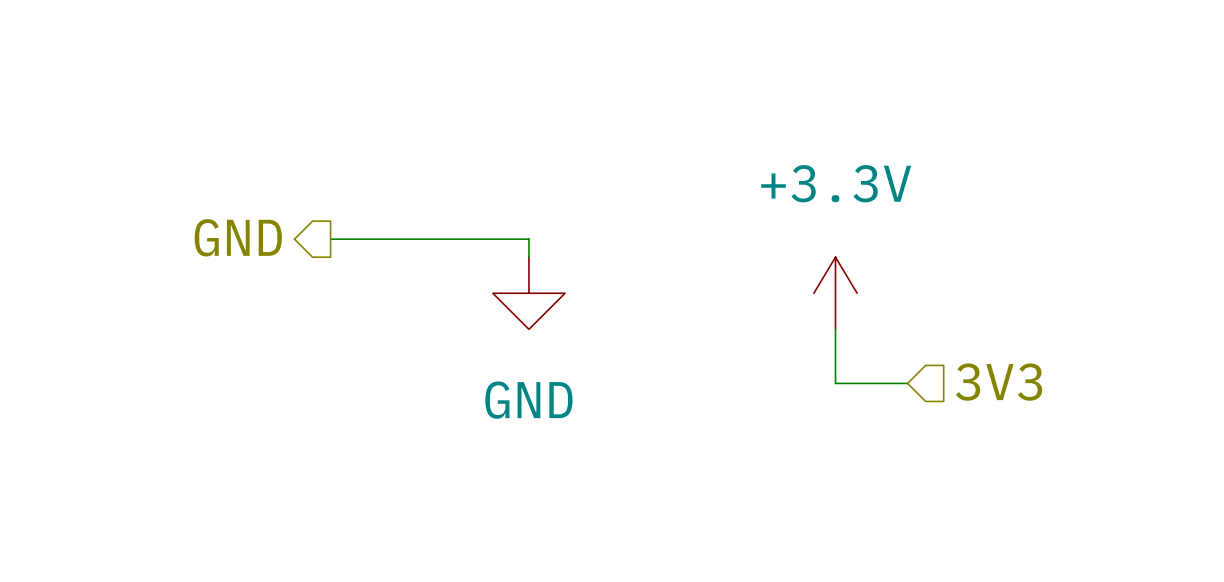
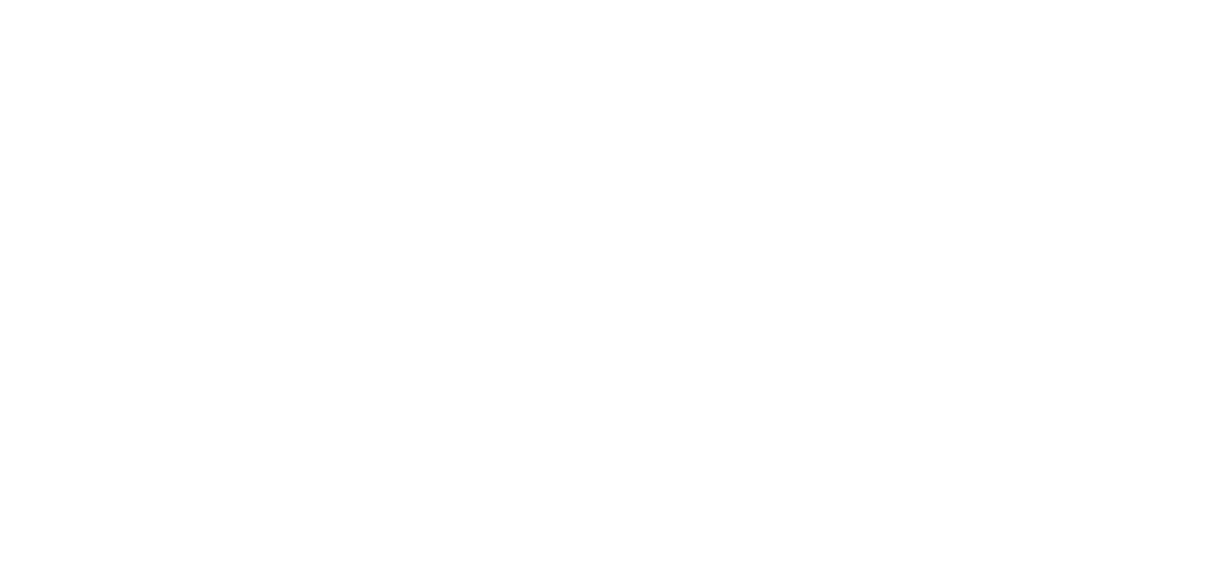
hierarchical label: GND (238, 237) -> none
wire: (330, 239) (528, 239) (528, 257) -> none
power symbol: GND (528, 293) -> none
power symbol: +3.3V (835, 293) -> none
wire: (835, 329) (835, 383) (907, 383) -> none
hierarchical label: 3V3 (999, 382) -> none

